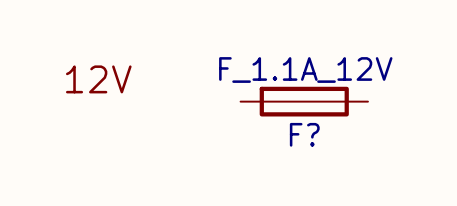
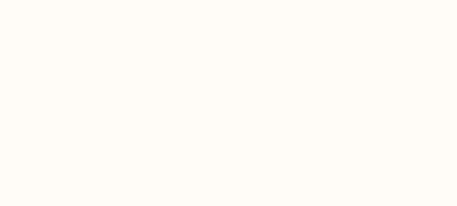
label: 12V (98, 79) -> none
F?: F_1.1A_12V (304, 101) -> none

